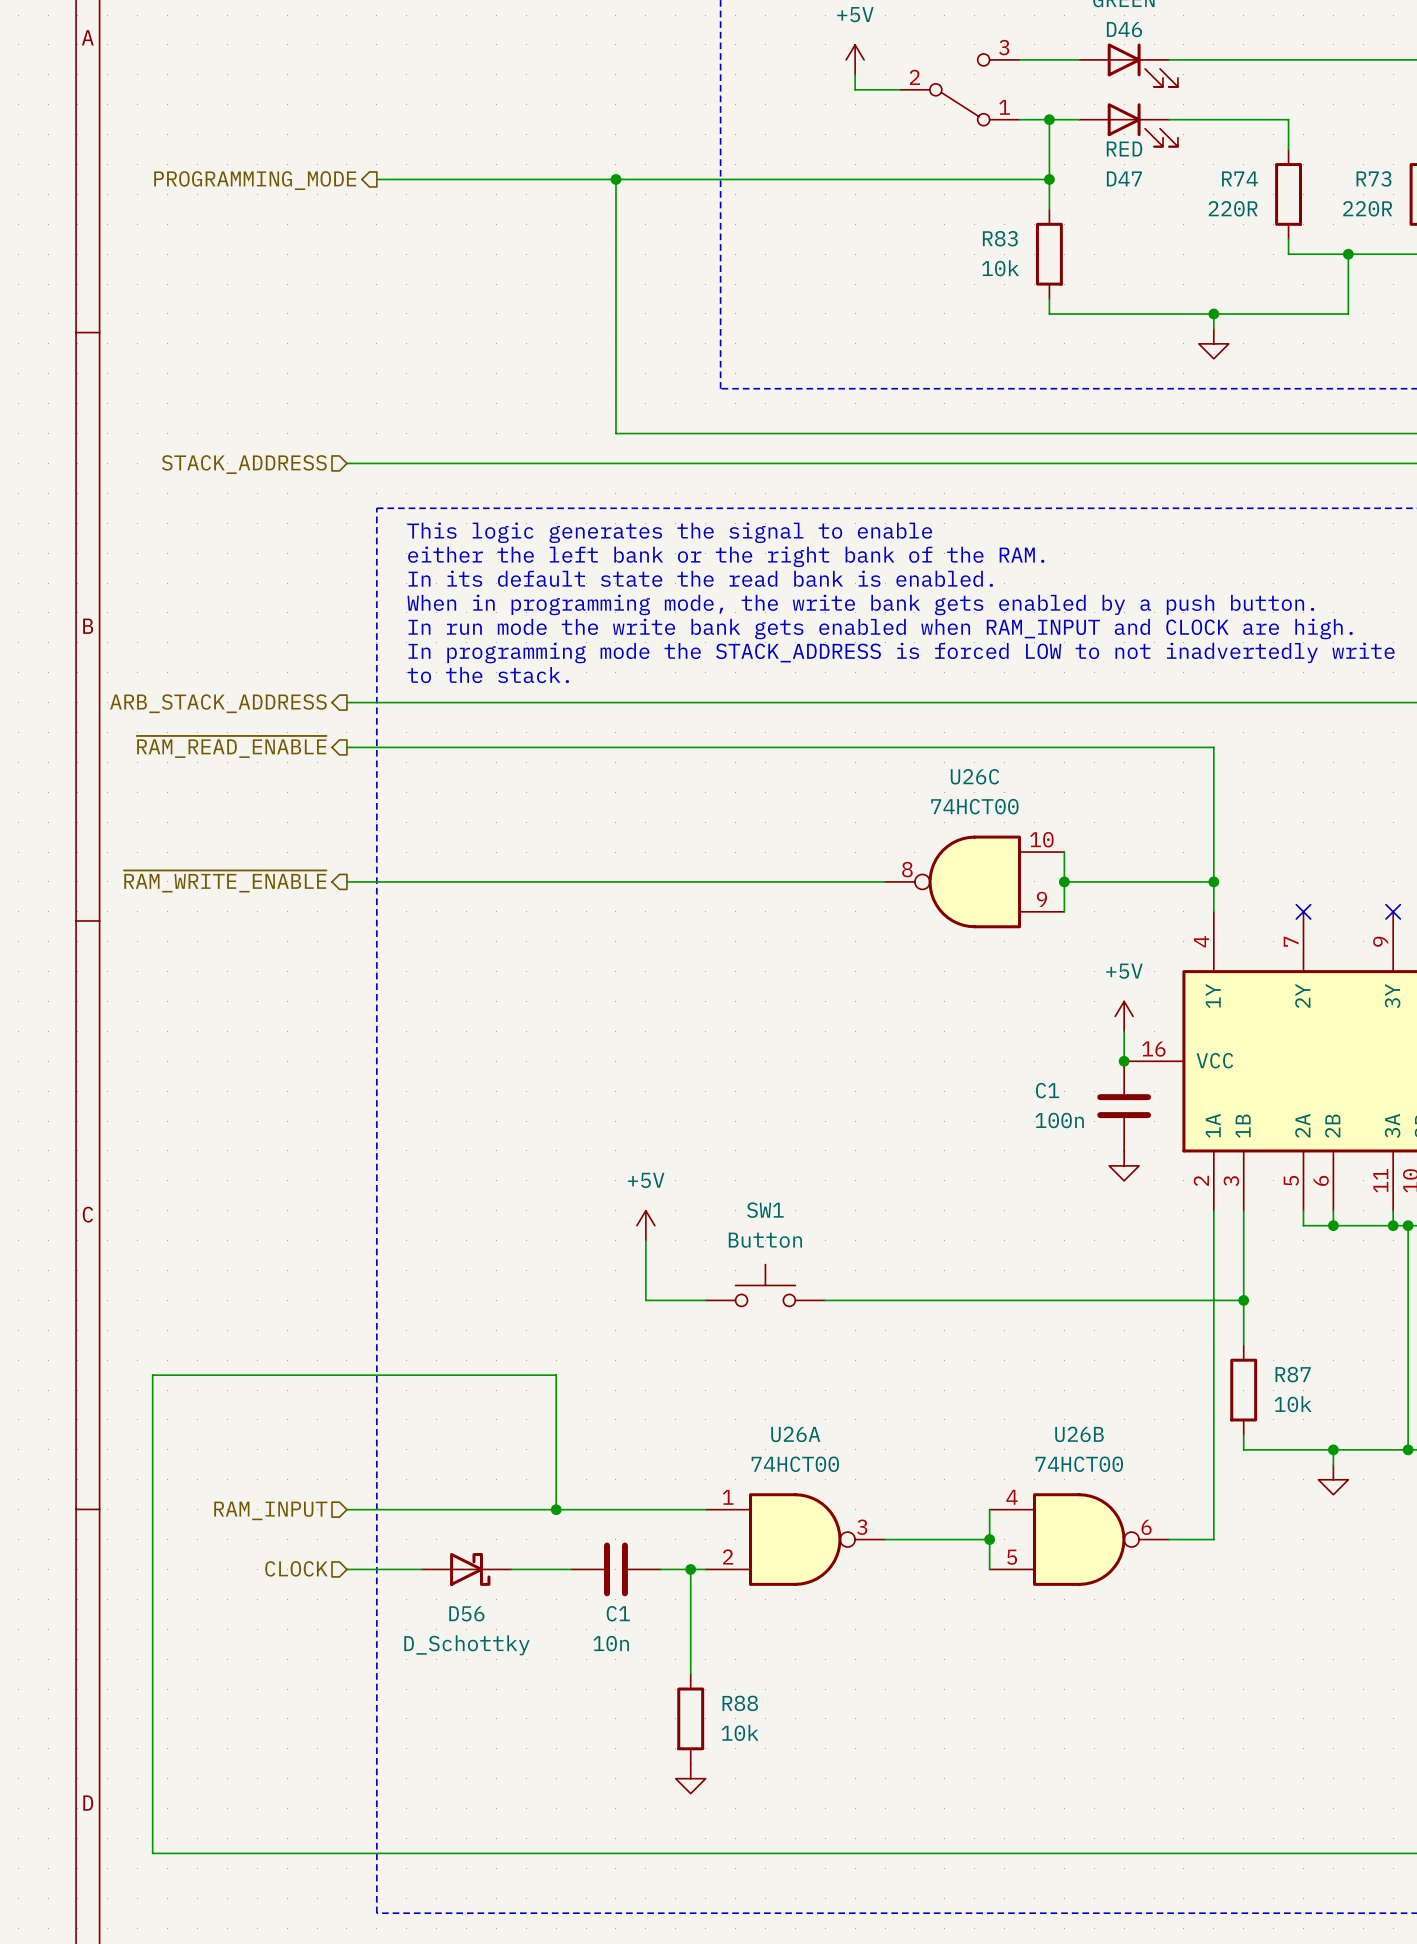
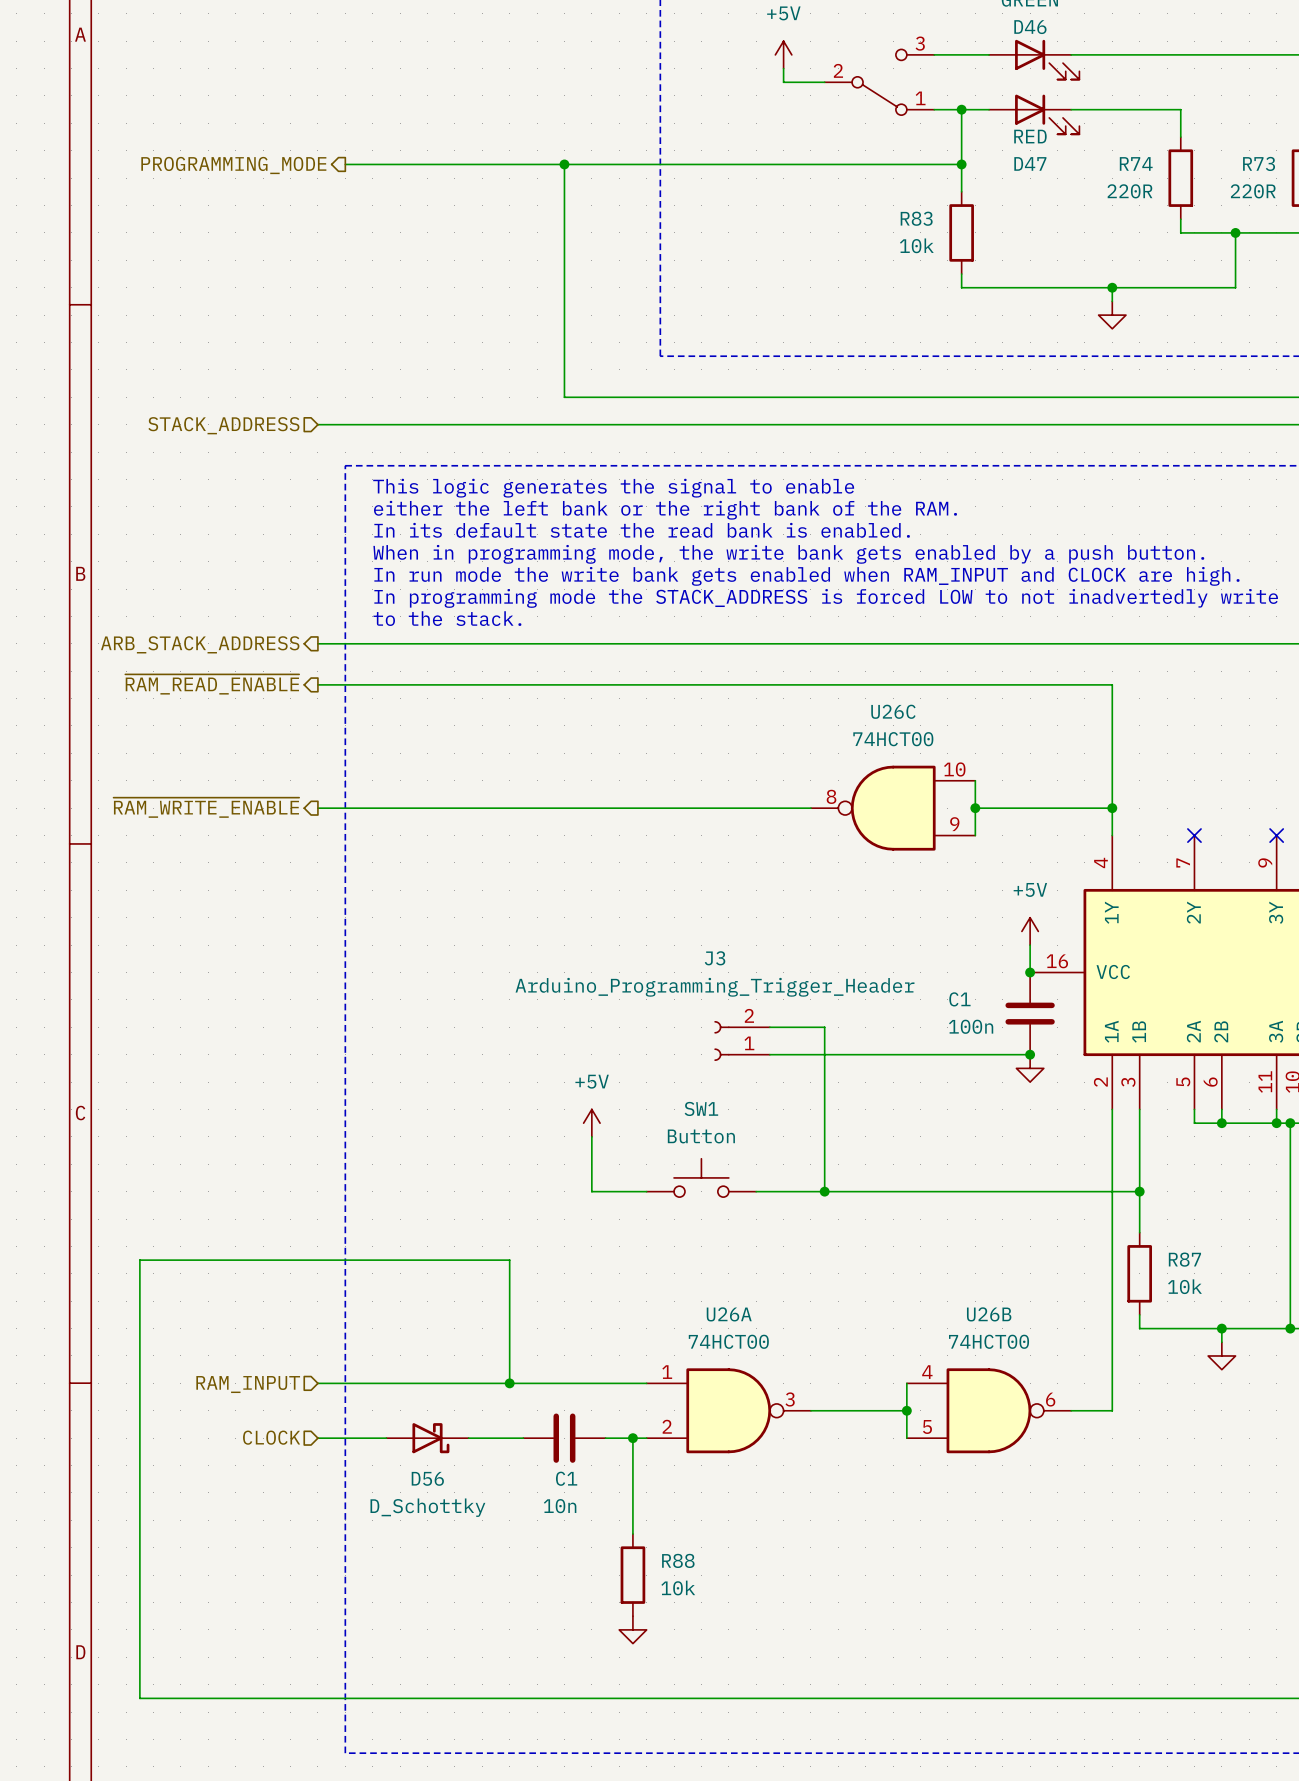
wire: none -> (769, 1027) (824, 1027) (824, 1191)
J3: none -> Arduino_Programming_Trigger_Header (742, 1040)
wire: none -> (769, 1054) (1030, 1054)
junction: none -> (1030, 1054)
junction: none -> (824, 1191)

